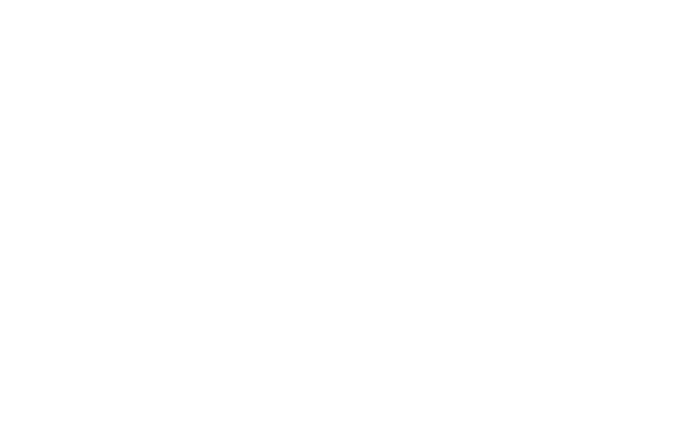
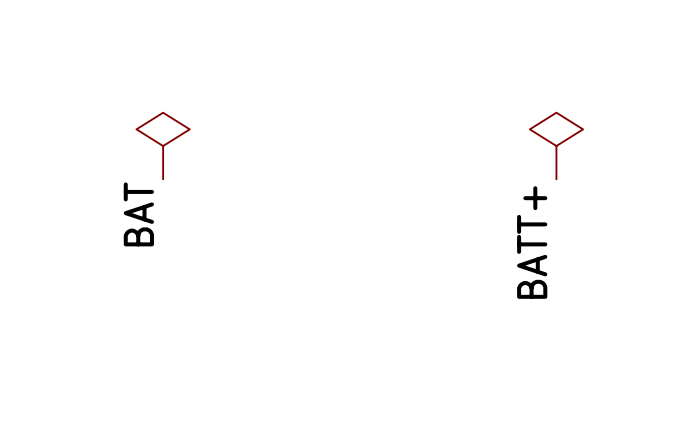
power symbol: none -> (163, 146)
power symbol: none -> (556, 146)
label: none -> BAT (138, 214)
label: none -> BATT+ (532, 242)

